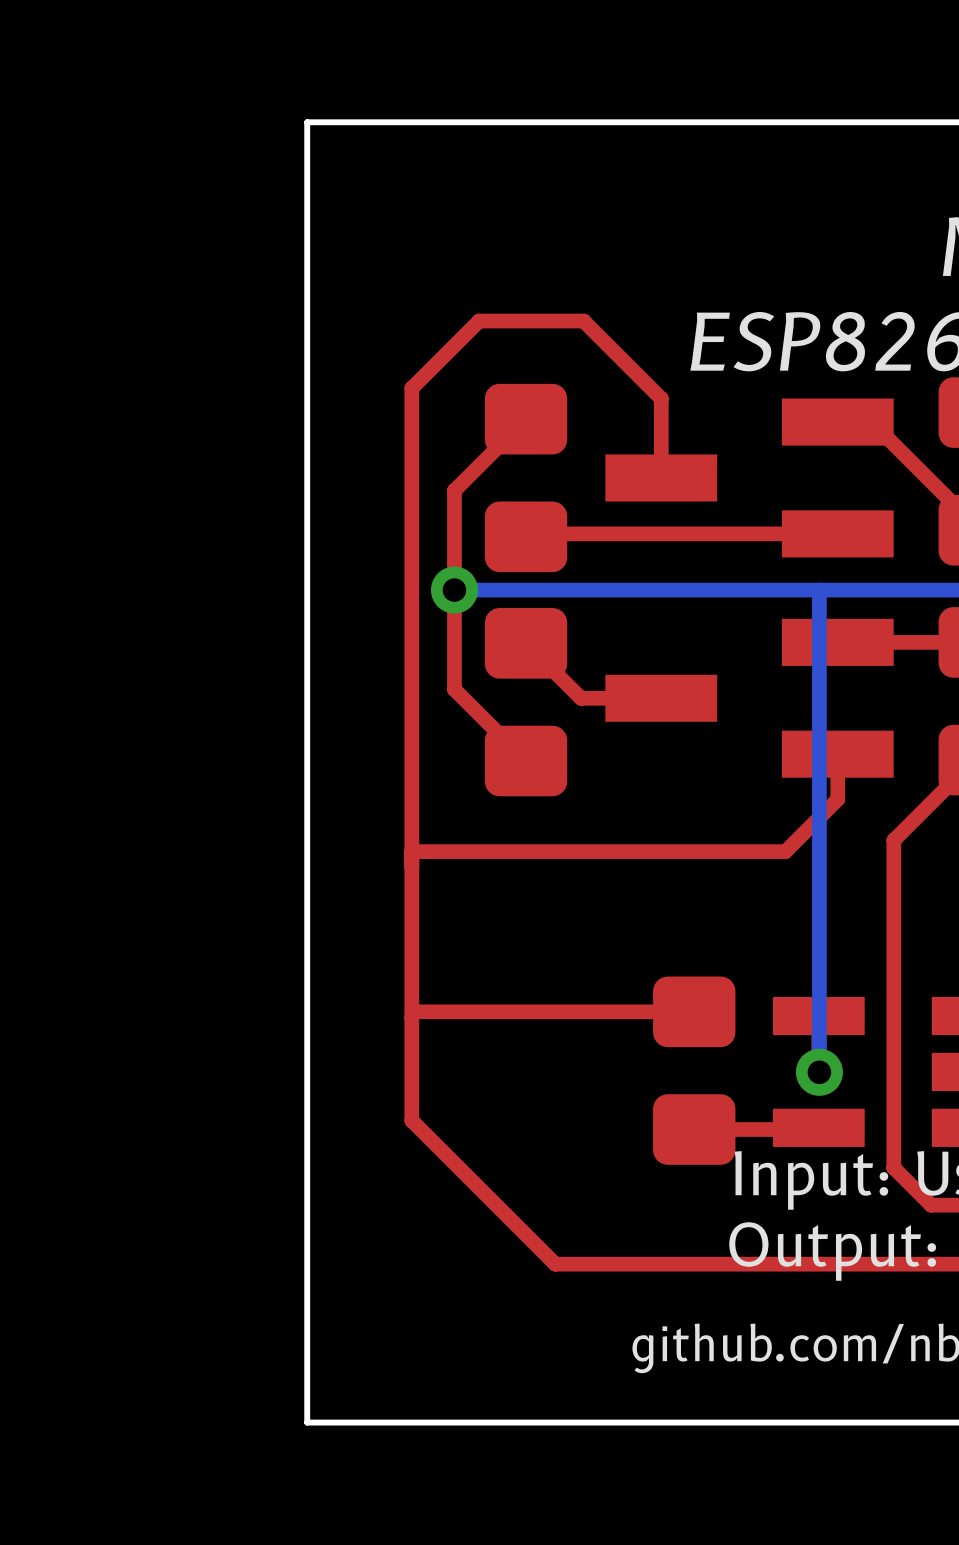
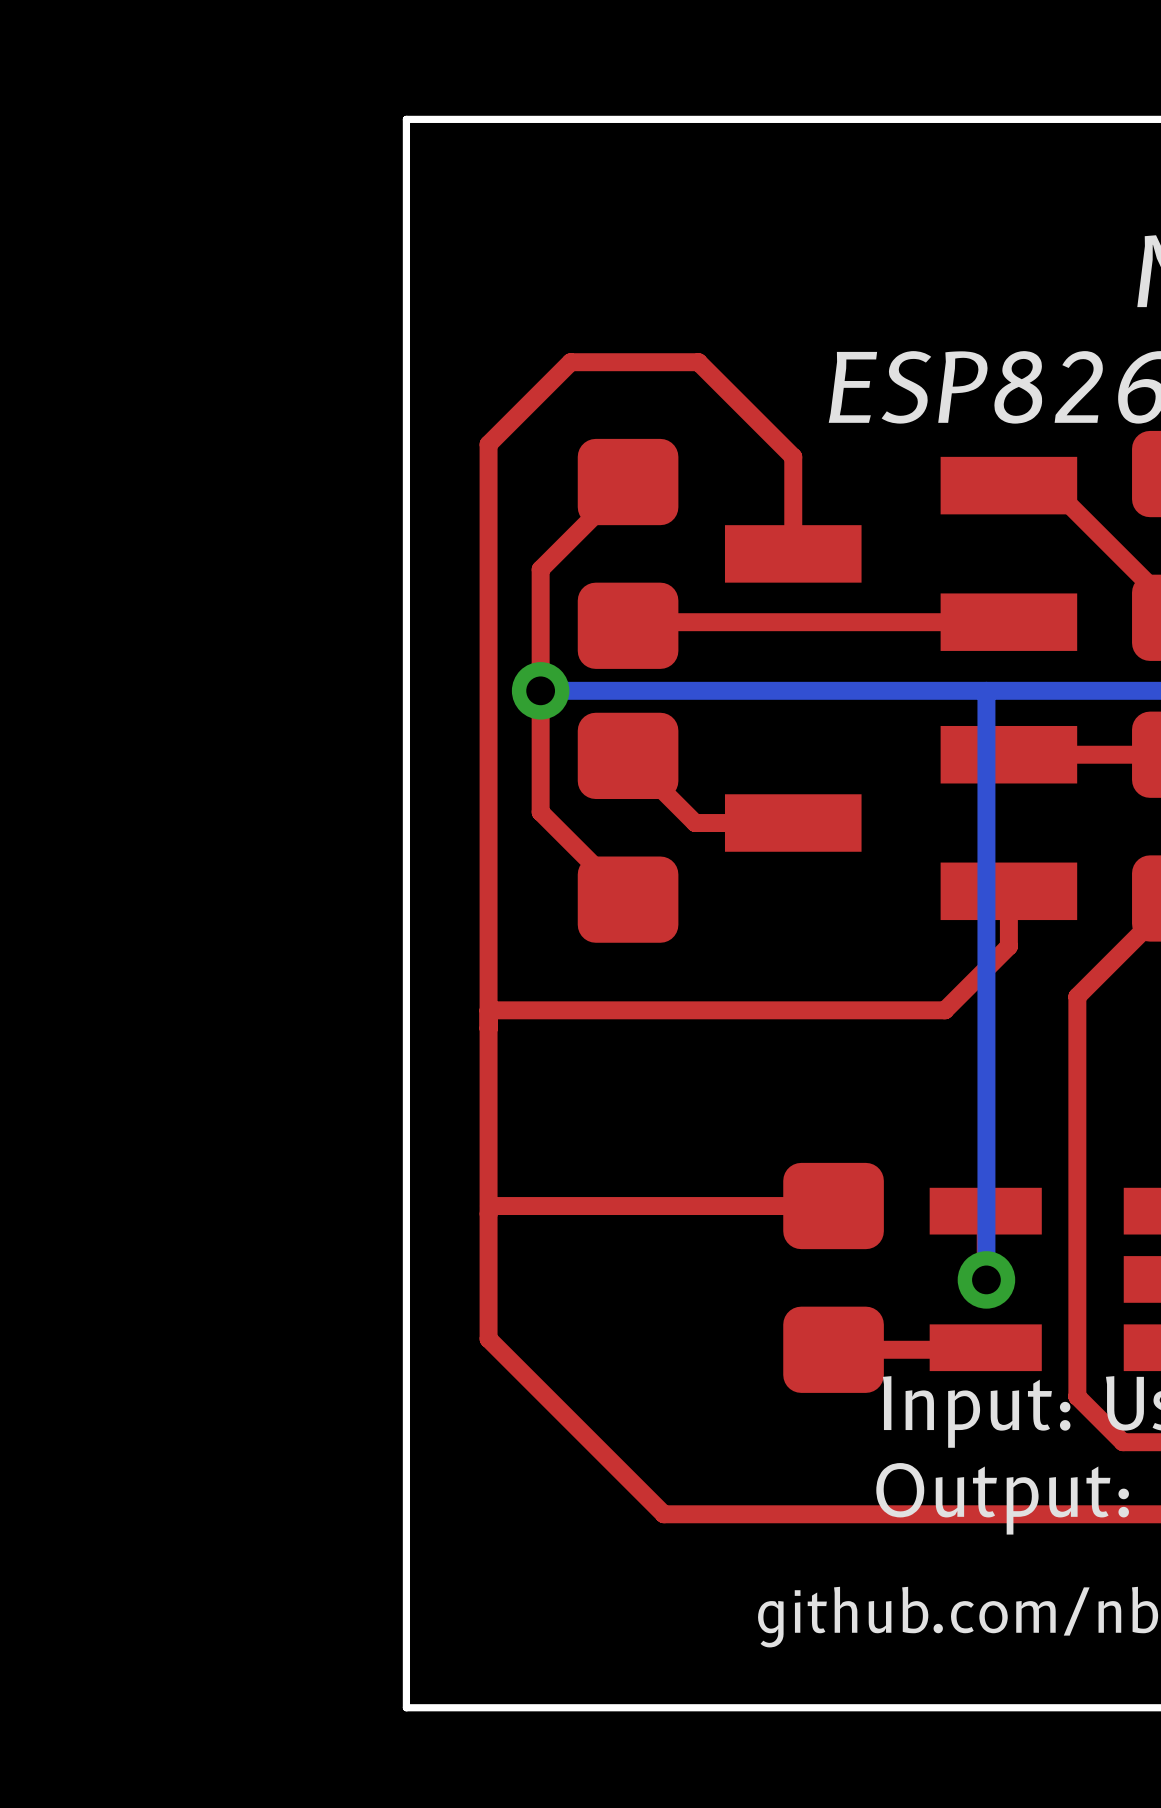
board edge: (344, 122) (307, 122) (307, 1422) (344, 1422) -> (406, 119) (406, 1707)

